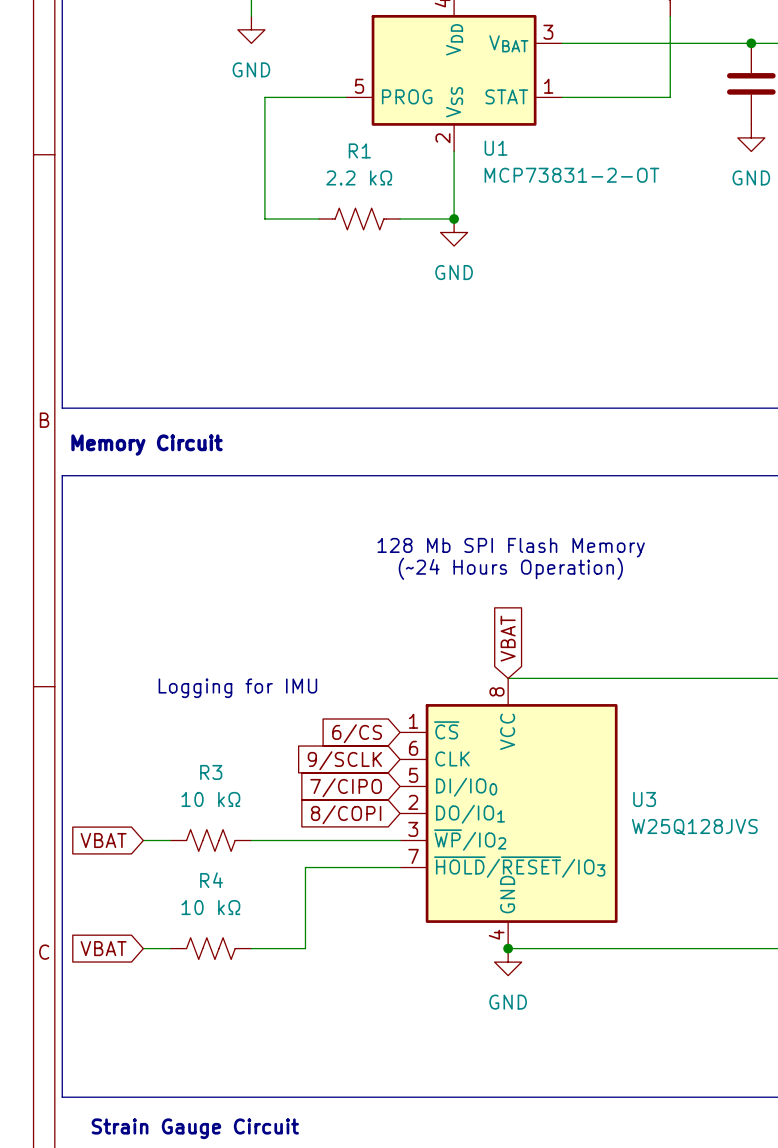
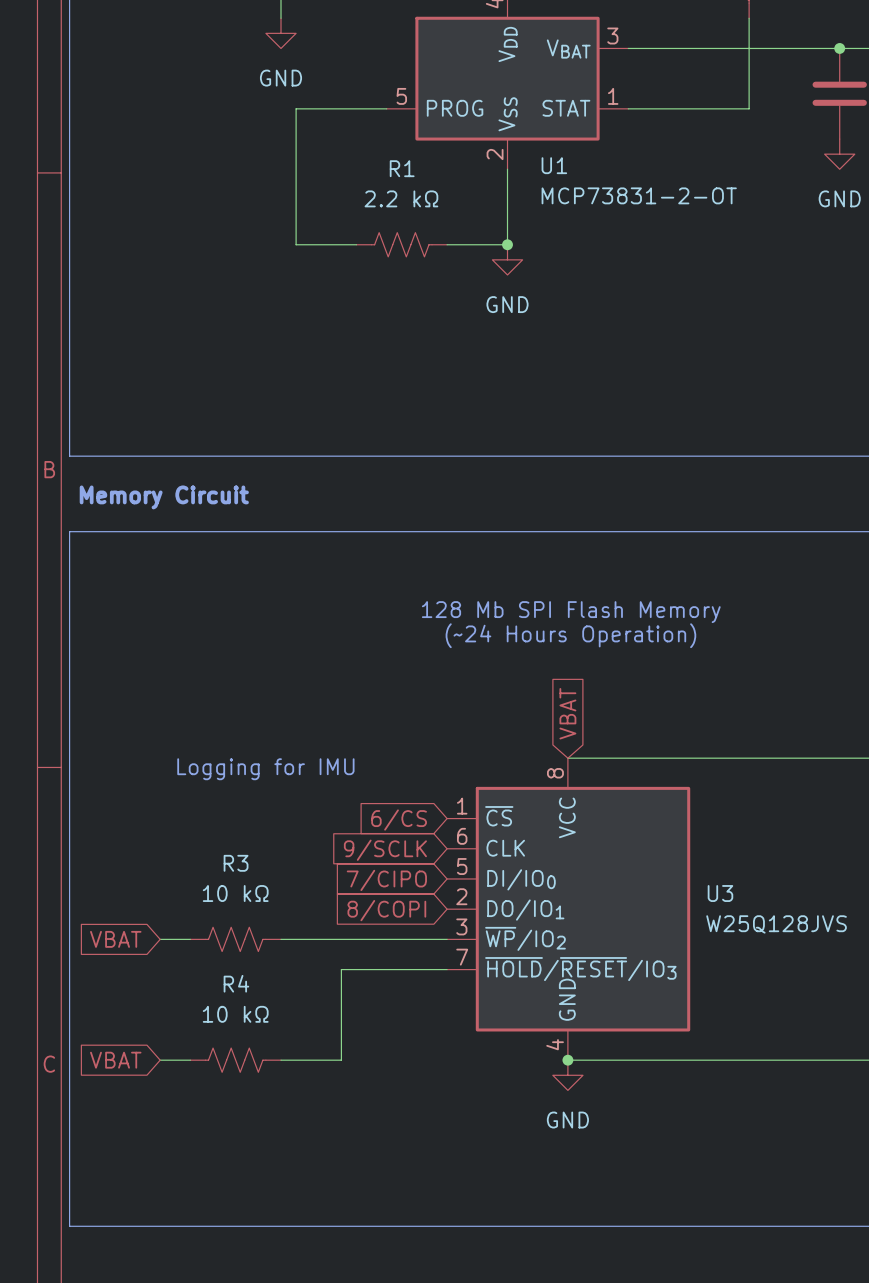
text: Strain Gauge Circuit (195, 1128) -> none

